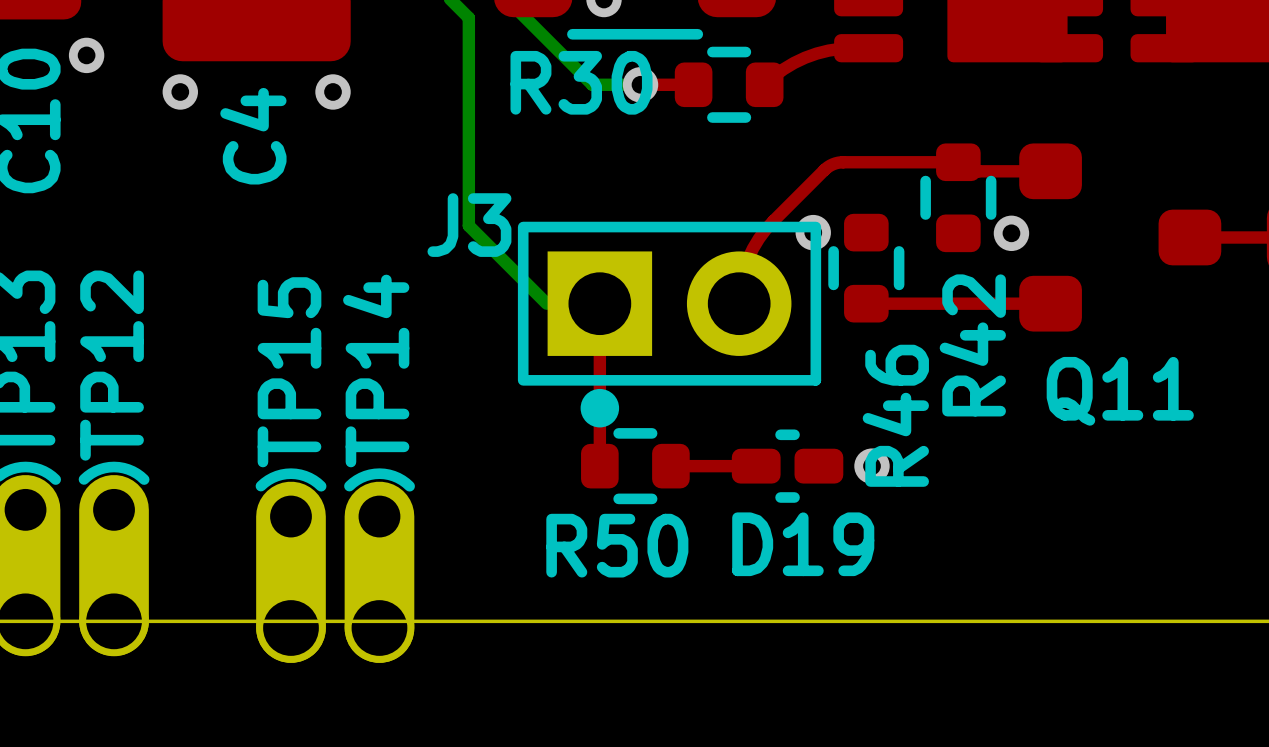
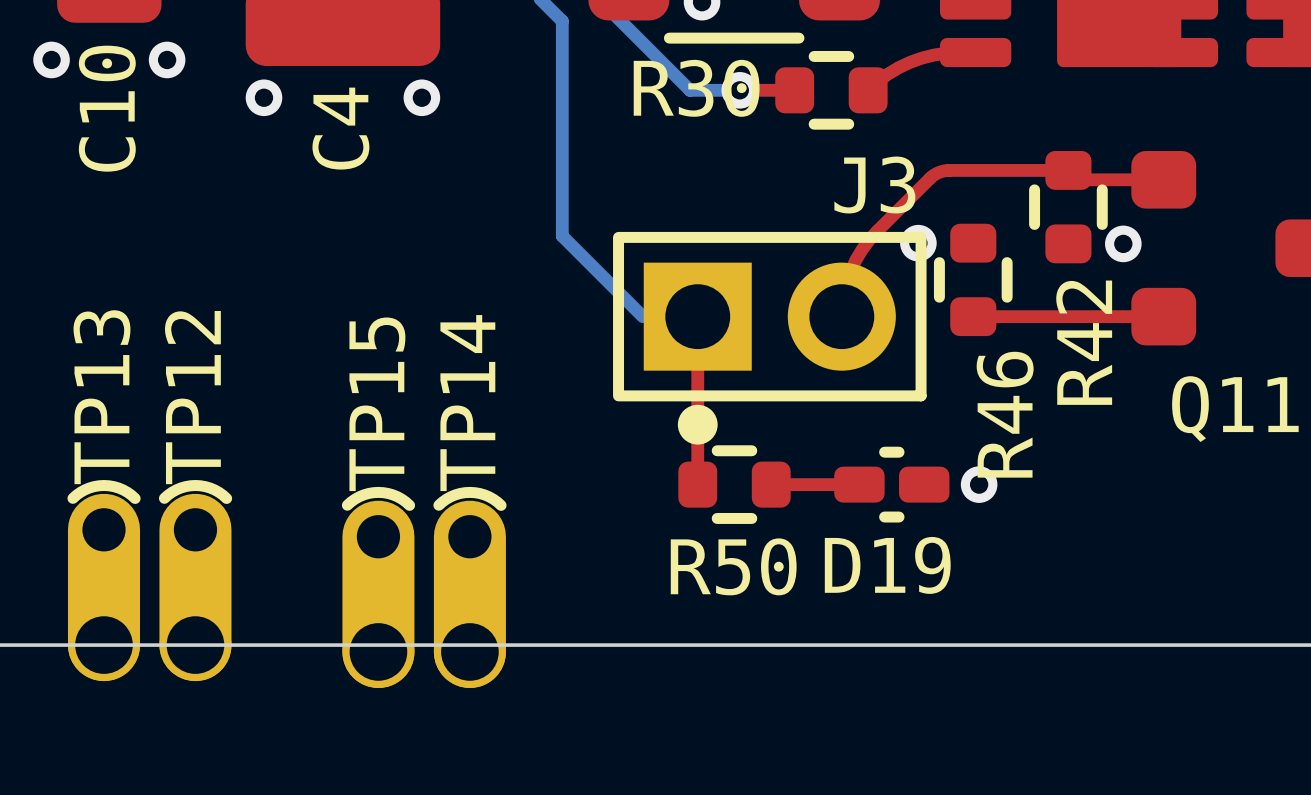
J3 name position: J3 (469, 225) -> J3 (874, 185)

